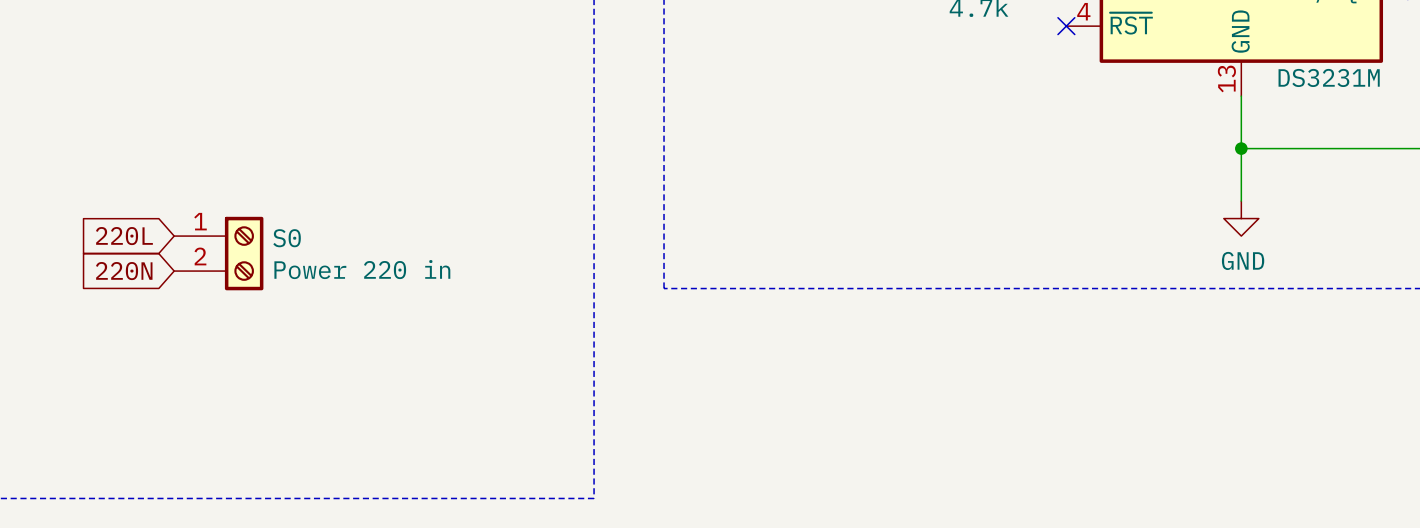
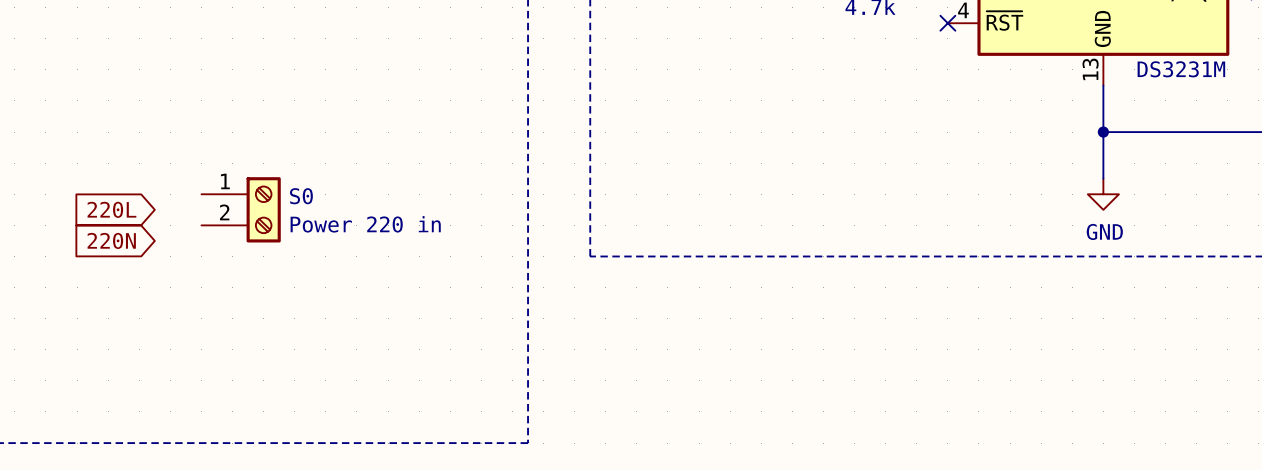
S0 position: (218, 253) -> (241, 209)

